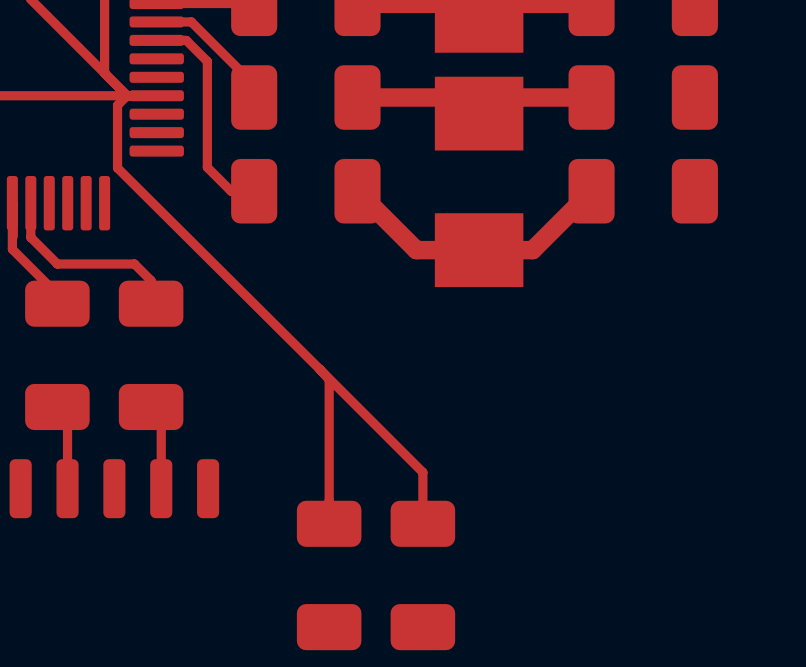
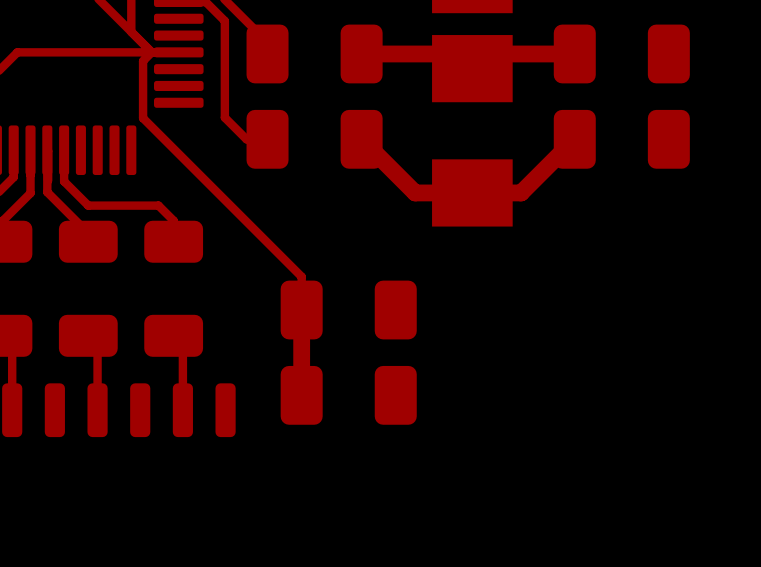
top track: (117, 168) (319, 369) -> (143, 118) (301, 276) (301, 395)
top track: (319, 369) (422, 472) (422, 523) -> none
top track: (319, 369) (329, 379) (329, 523) -> none
part: none -> (348, 310)
part: none -> (348, 395)
part: (329, 575) -> none
part: (422, 575) -> none

